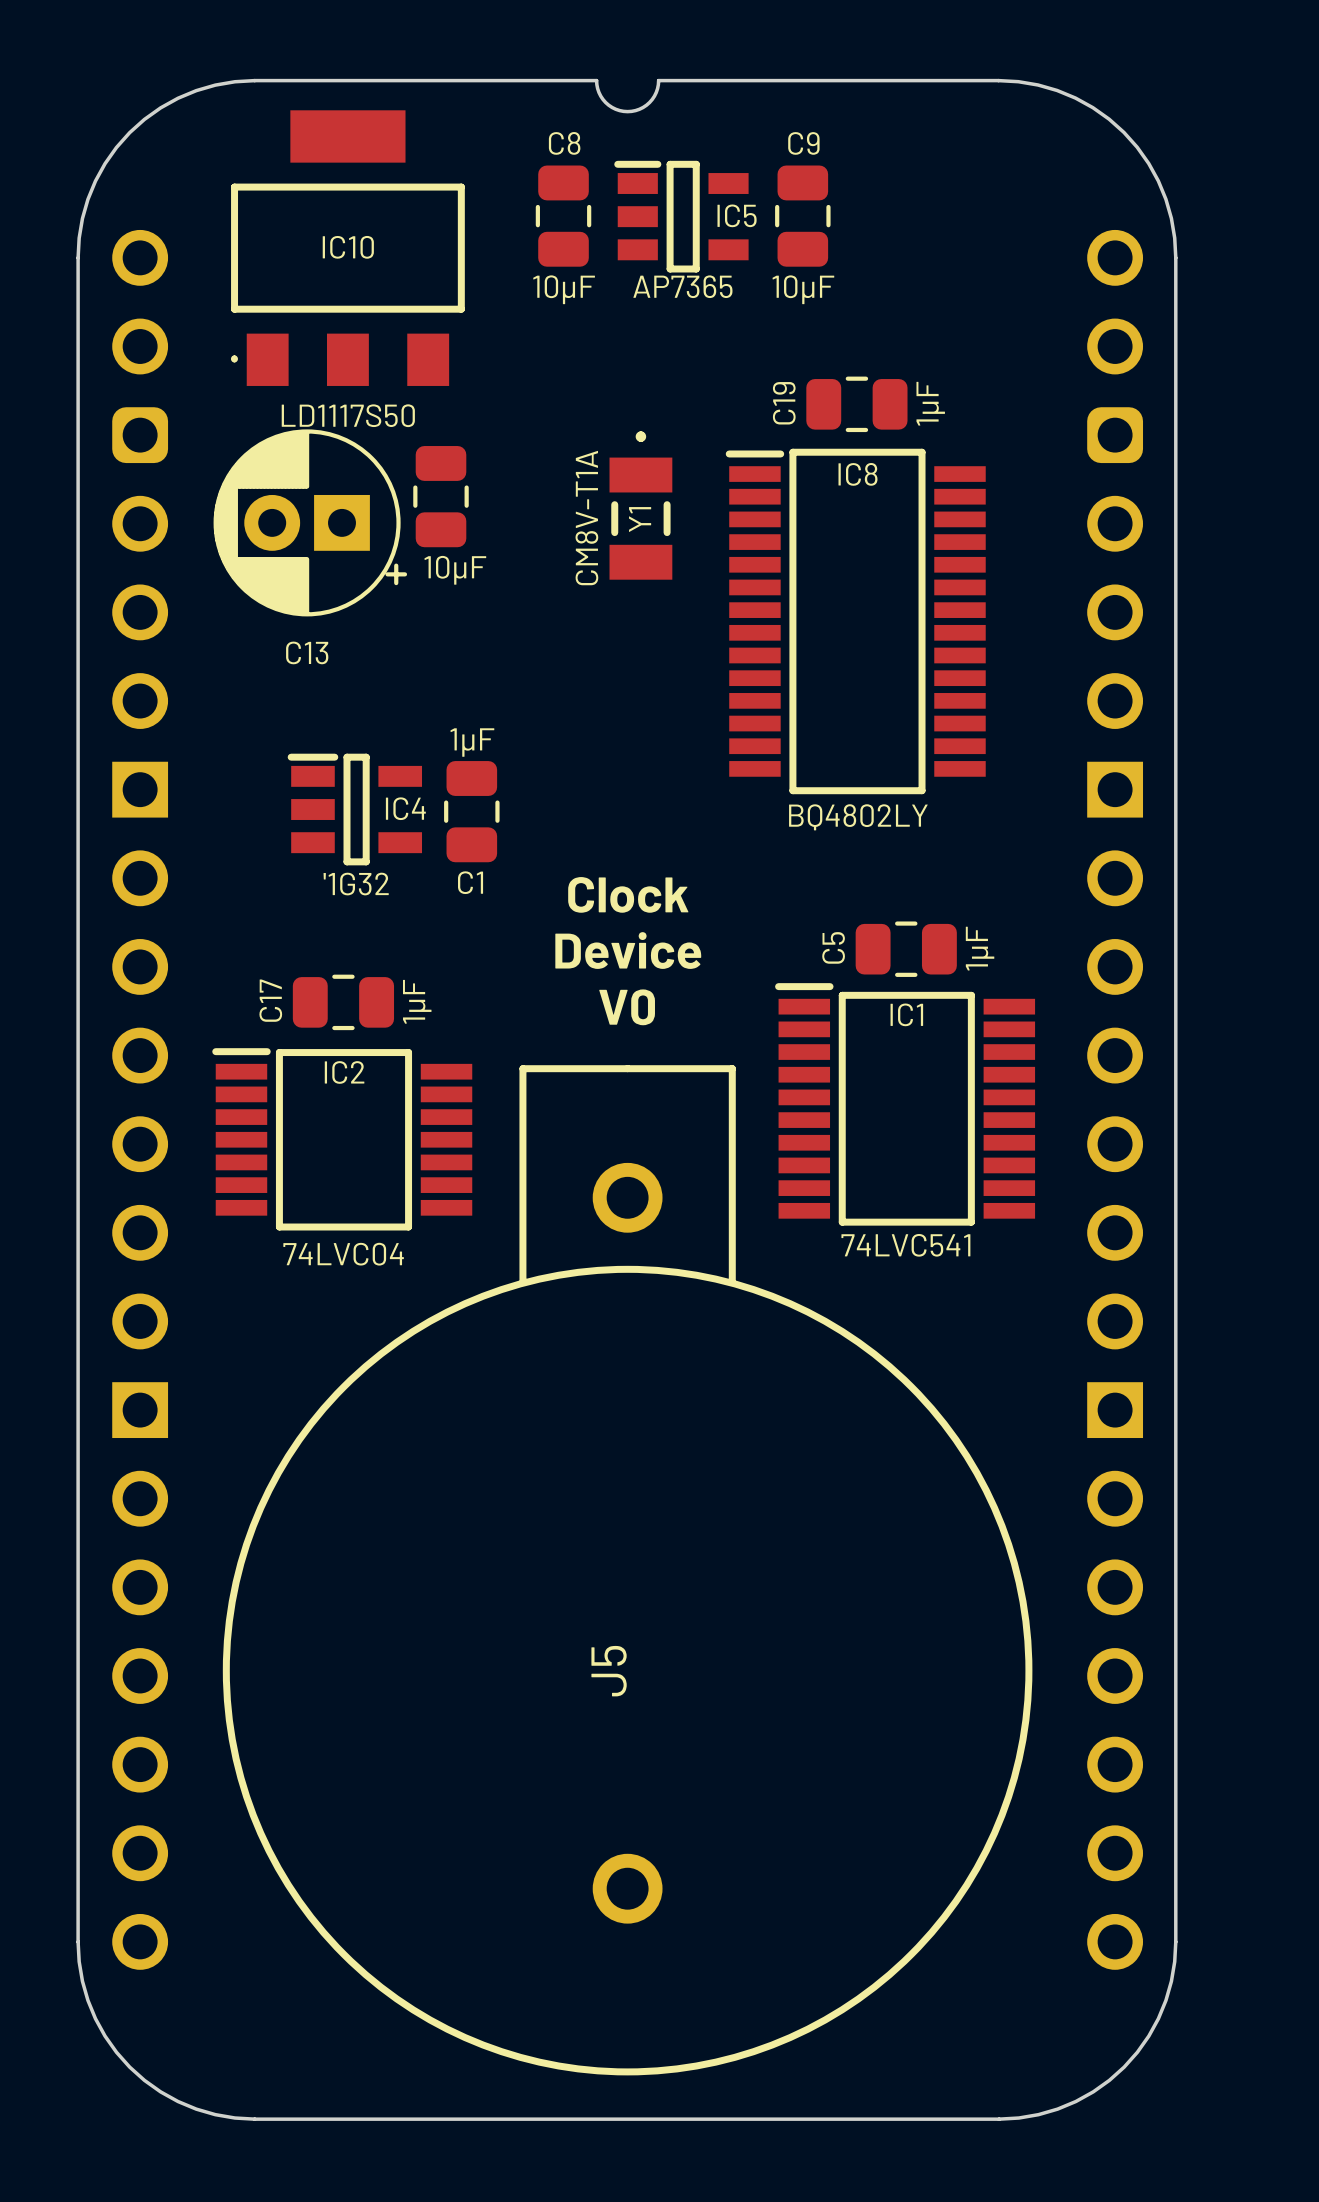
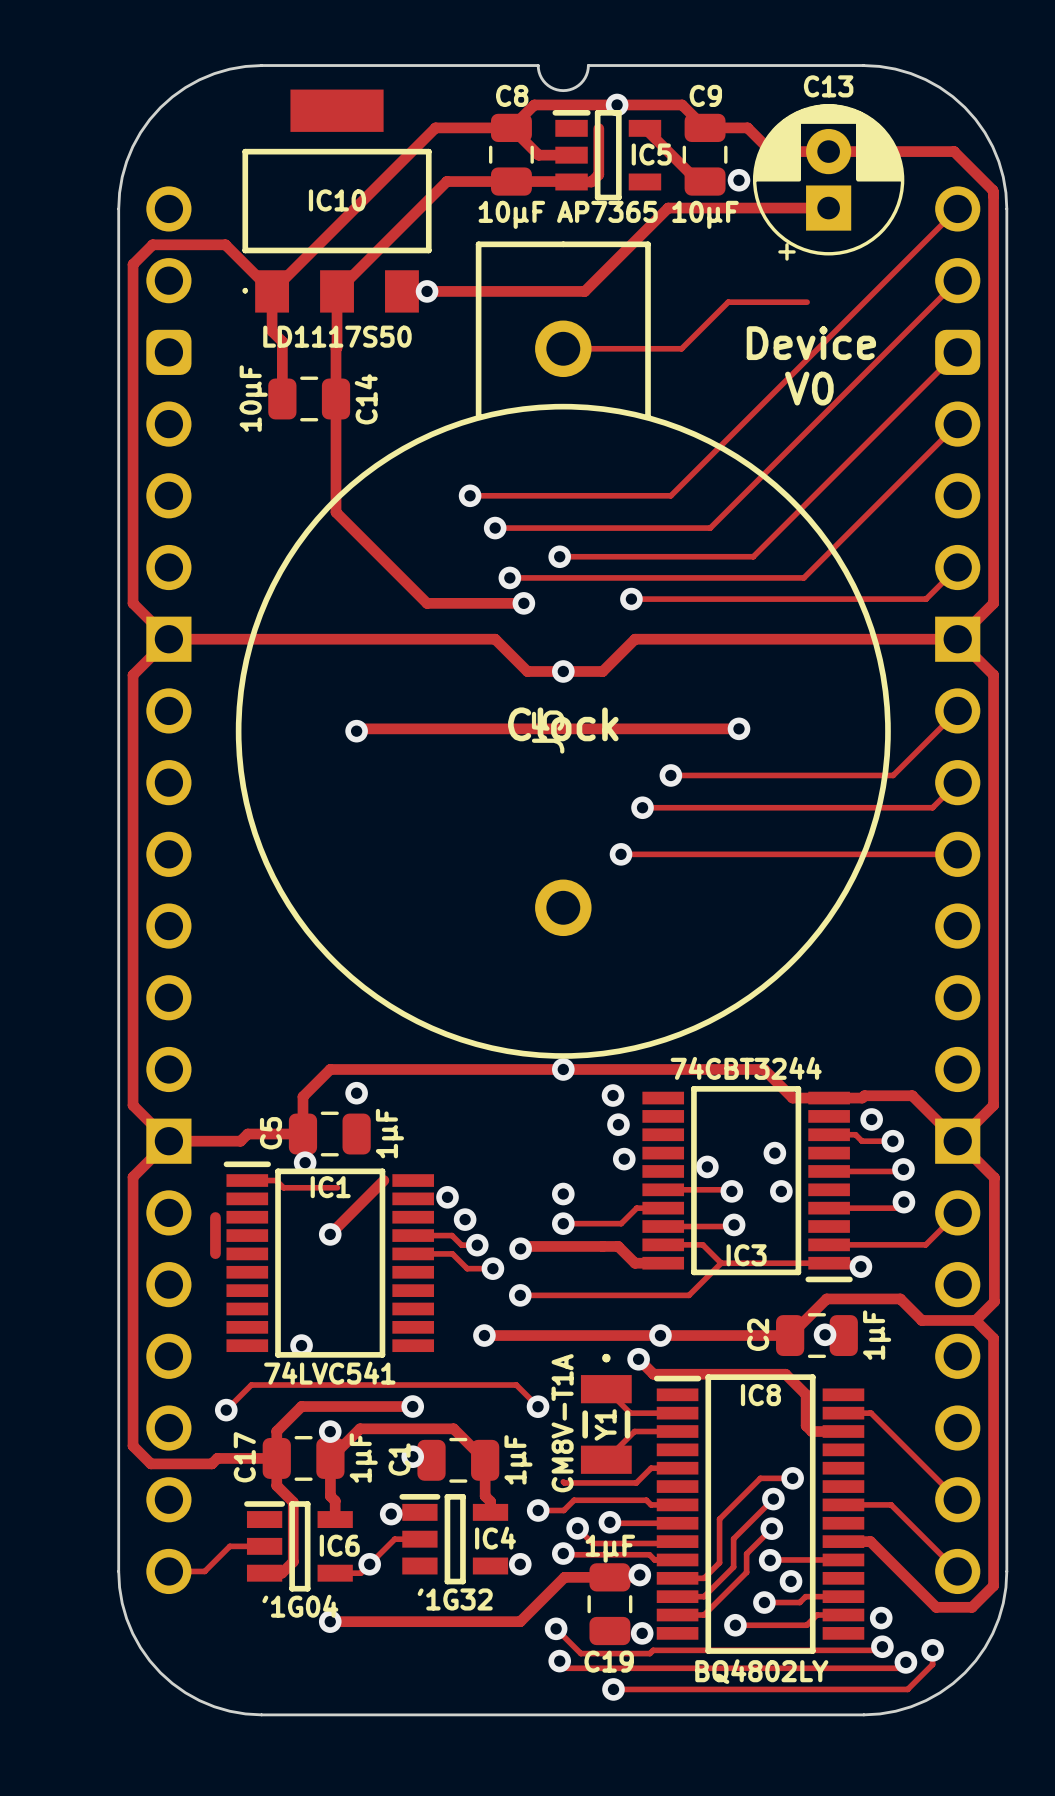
via: none -> (617, 104)
track: none -> (511, 127) (534, 104) (682, 104) (705, 127) (747, 127) (771, 151) (954, 151) (992, 190) (993, 603) (957, 639)
track: none -> (511, 127) (435, 127) (272, 291)
track: none -> (511, 127) (538, 155) (571, 155)
track: none -> (598, 128) (598, 174) (591, 181) (571, 181)
track: none -> (644, 128) (698, 181)
C8 position: (563, 216) -> (511, 154)
IC5 position: (681, 216) -> (606, 155)
C9 position: (802, 216) -> (705, 154)
via: none -> (739, 180)
track: none -> (571, 181) (446, 181) (337, 291) (336, 512) (427, 603) (523, 603)
track: none -> (828, 208) (668, 208) (584, 291) (401, 291)
track: none -> (957, 208) (670, 495) (470, 495)
track: none -> (957, 280) (710, 528) (495, 528)
track: none -> (272, 291) (272, 331) (282, 341) (282, 398)
track: none -> (272, 291) (225, 244) (152, 244) (133, 264) (133, 603) (168, 639)
via: none -> (427, 291)
track: none -> (807, 302) (728, 302) (681, 348) (563, 348)
C19 name position: C19 (784, 403) -> C19 (609, 1661)
C19 value position: 1μF (930, 403) -> 1μF (610, 1548)
C19 rotation: 0° (856, 404) -> 90° clockwise (609, 1604)
C19 position: (856, 404) -> (609, 1604)
track: none -> (957, 352) (753, 556) (559, 556)
C14: none -> 10µF (309, 398)
part: 10µF (441, 496) -> none
Y1 position: (640, 505) -> (606, 1413)
C13 rotation: 0° (310, 522) -> 90° clockwise (828, 182)
C13 position: (310, 522) -> (828, 182)
track: none -> (957, 424) (803, 577) (509, 577)
via: none -> (470, 495)
IC8 position: (855, 621) -> (759, 1514)
C13 name position: C13 (307, 652) -> C13 (828, 86)
via: none -> (495, 528)
via: none -> (559, 556)
track: none -> (957, 567) (926, 599) (631, 599)
via: none -> (509, 577)
via: none -> (631, 599)
via: none -> (523, 603)
track: none -> (168, 639) (133, 675) (133, 1105) (168, 1141)
track: none -> (168, 639) (495, 639) (527, 671) (602, 671) (635, 639) (957, 639)
track: none -> (957, 639) (993, 675) (993, 1105) (957, 1141)
IC4 position: (354, 809) -> (453, 1539)
C1 rotation: 0° (471, 811) -> 90° clockwise (458, 1460)
C1 position: (471, 811) -> (458, 1460)
via: none -> (563, 671)
track: none -> (957, 710) (893, 775) (670, 775)
track: none -> (739, 728) (358, 728) (356, 731)
via: none -> (739, 728)
via: none -> (356, 731)
C5 position: (906, 949) -> (329, 1134)
text position: Device (628, 950) -> Device (811, 343)
via: none -> (670, 775)
track: none -> (957, 782) (932, 807) (642, 807)
via: none -> (642, 807)
C17 position: (343, 1002) -> (303, 1458)
text position: V0 (627, 1007) -> V0 (809, 388)
track: none -> (621, 854) (957, 854)
via: none -> (621, 854)
IC1 position: (905, 1104) -> (328, 1259)
IC2: (342, 1139) -> none
via: none -> (563, 1069)
via: none -> (356, 1093)
via: none -> (613, 1095)
via: none -> (871, 1119)
via: none -> (618, 1124)
track: none -> (302, 1134) (247, 1134) (240, 1141) (168, 1141)
track: none -> (829, 1134) (855, 1134) (862, 1141) (892, 1141)
track: none -> (168, 1141) (133, 1177) (133, 1445) (150, 1463) (211, 1463) (217, 1458) (276, 1458)
via: none -> (892, 1141)
via: none -> (774, 1153)
via: none -> (624, 1159)
track: none -> (305, 1162) (302, 1160) (302, 1096) (330, 1069) (764, 1069) (792, 1098) (912, 1095) (994, 1177) (994, 1301) (975, 1320)
via: none -> (305, 1162)
via: none -> (707, 1166)
track: none -> (903, 1169) (901, 1171) (829, 1171)
via: none -> (903, 1169)
track: none -> (247, 1180) (276, 1180) (283, 1187) (337, 1187)
track: none -> (383, 1180) (329, 1235)
IC3: none -> (747, 1184)
track: none -> (663, 1189) (730, 1189) (731, 1191)
via: none -> (731, 1191)
via: none -> (781, 1191)
via: none -> (563, 1194)
via: none -> (447, 1197)
track: none -> (903, 1202) (897, 1208) (829, 1208)
via: none -> (903, 1202)
track: none -> (663, 1208) (636, 1208) (621, 1223) (563, 1223)
track: none -> (957, 1212) (925, 1244) (829, 1244)
track: none -> (215, 1217) (215, 1253)
via: none -> (465, 1219)
via: none -> (563, 1223)
track: none -> (734, 1224) (732, 1226) (663, 1226)
via: none -> (734, 1224)
via: none -> (330, 1234)
track: none -> (413, 1235) (452, 1235) (461, 1245) (477, 1245)
via: none -> (477, 1245)
track: none -> (663, 1244) (702, 1244) (721, 1263)
track: none -> (520, 1248) (522, 1246) (618, 1246) (635, 1263) (663, 1263)
via: none -> (520, 1248)
track: none -> (413, 1253) (452, 1253) (467, 1268) (492, 1268)
track: none -> (721, 1263) (857, 1263) (860, 1266)
track: none -> (721, 1263) (689, 1295) (520, 1295)
via: none -> (860, 1266)
via: none -> (492, 1268)
J5 position: (627, 1570) -> (563, 650)
via: none -> (520, 1295)
track: none -> (975, 1320) (921, 1320) (900, 1298) (826, 1298) (790, 1335) (484, 1335)
track: none -> (975, 1320) (993, 1338) (993, 1585) (972, 1607) (936, 1607) (870, 1541) (843, 1541)
via: none -> (825, 1334)
via: none -> (484, 1335)
via: none -> (660, 1335)
C2: none -> 1μF (816, 1335)
via: none -> (301, 1345)
track: none -> (638, 1359) (653, 1374) (785, 1374) (806, 1394) (806, 1425) (811, 1431) (843, 1431)
via: none -> (638, 1359)
track: none -> (606, 1389) (630, 1413) (677, 1413)
track: none -> (412, 1406) (301, 1406) (276, 1431) (276, 1485) (293, 1502) (293, 1561) (281, 1573) (264, 1573)
via: none -> (412, 1406)
track: none -> (538, 1406) (516, 1385) (251, 1385) (226, 1410)
via: none -> (538, 1406)
via: none -> (226, 1410)
track: none -> (843, 1413) (871, 1413) (957, 1499)
track: none -> (677, 1431) (634, 1431) (606, 1459)
via: none -> (330, 1431)
via: none -> (412, 1456)
track: none -> (677, 1468) (651, 1468) (636, 1482) (563, 1481)
track: none -> (792, 1478) (760, 1478) (719, 1519) (719, 1562) (704, 1578) (677, 1578)
via: none -> (792, 1478)
track: none -> (773, 1499) (733, 1538) (733, 1567) (704, 1596) (677, 1596)
via: none -> (773, 1499)
track: none -> (677, 1504) (651, 1504) (646, 1500) (574, 1500) (563, 1510) (538, 1510)
track: none -> (843, 1504) (891, 1504) (957, 1571)
via: none -> (538, 1510)
track: none -> (490, 1512) (490, 1501) (485, 1496) (485, 1460) (453, 1428) (360, 1428) (330, 1458) (330, 1496) (335, 1500) (335, 1519)
via: none -> (391, 1514)
track: none -> (609, 1522) (677, 1523)
via: none -> (609, 1522)
track: none -> (577, 1528) (592, 1543) (675, 1543)
via: none -> (577, 1528)
track: none -> (771, 1528) (746, 1553) (746, 1572) (704, 1615) (677, 1615)
via: none -> (771, 1528)
track: none -> (419, 1539) (394, 1539) (360, 1573) (335, 1573)
track: none -> (264, 1546) (229, 1546) (204, 1571) (168, 1571)
IC6: none -> (298, 1546)
track: none -> (563, 1553) (649, 1554) (654, 1559) (677, 1559)
via: none -> (563, 1553)
track: none -> (770, 1559) (843, 1559)
via: none -> (770, 1560)
via: none -> (369, 1564)
via: none -> (520, 1564)
track: none -> (639, 1575) (637, 1577) (564, 1577) (520, 1621) (330, 1621)
via: none -> (639, 1575)
via: none -> (791, 1581)
track: none -> (843, 1596) (805, 1596) (799, 1602) (764, 1602)
via: none -> (764, 1602)
track: none -> (843, 1615) (816, 1615) (806, 1625) (735, 1625)
via: none -> (881, 1618)
via: none -> (330, 1621)
via: none -> (735, 1625)
track: none -> (556, 1628) (580, 1653) (649, 1653) (653, 1650) (878, 1650) (882, 1646)
via: none -> (556, 1628)
via: none -> (642, 1633)
via: none -> (882, 1646)
track: none -> (932, 1650) (932, 1664) (907, 1689) (613, 1689)
via: none -> (932, 1650)
track: none -> (559, 1661) (566, 1668) (900, 1668) (905, 1662)
via: none -> (559, 1661)
via: none -> (905, 1662)
via: none -> (613, 1689)

